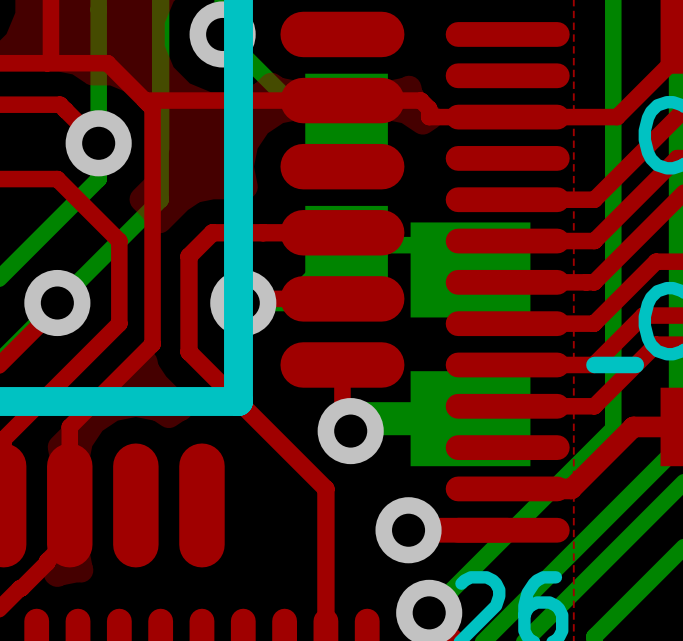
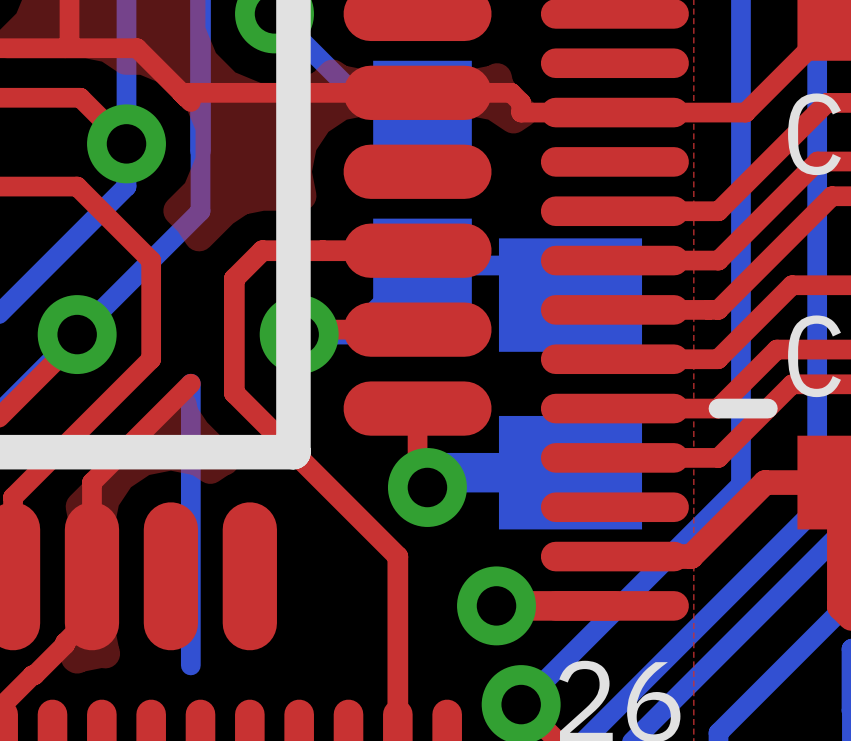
top track: (152, 108) (152, 344) -> none
bottom track: none -> (190, 383) (190, 665)

